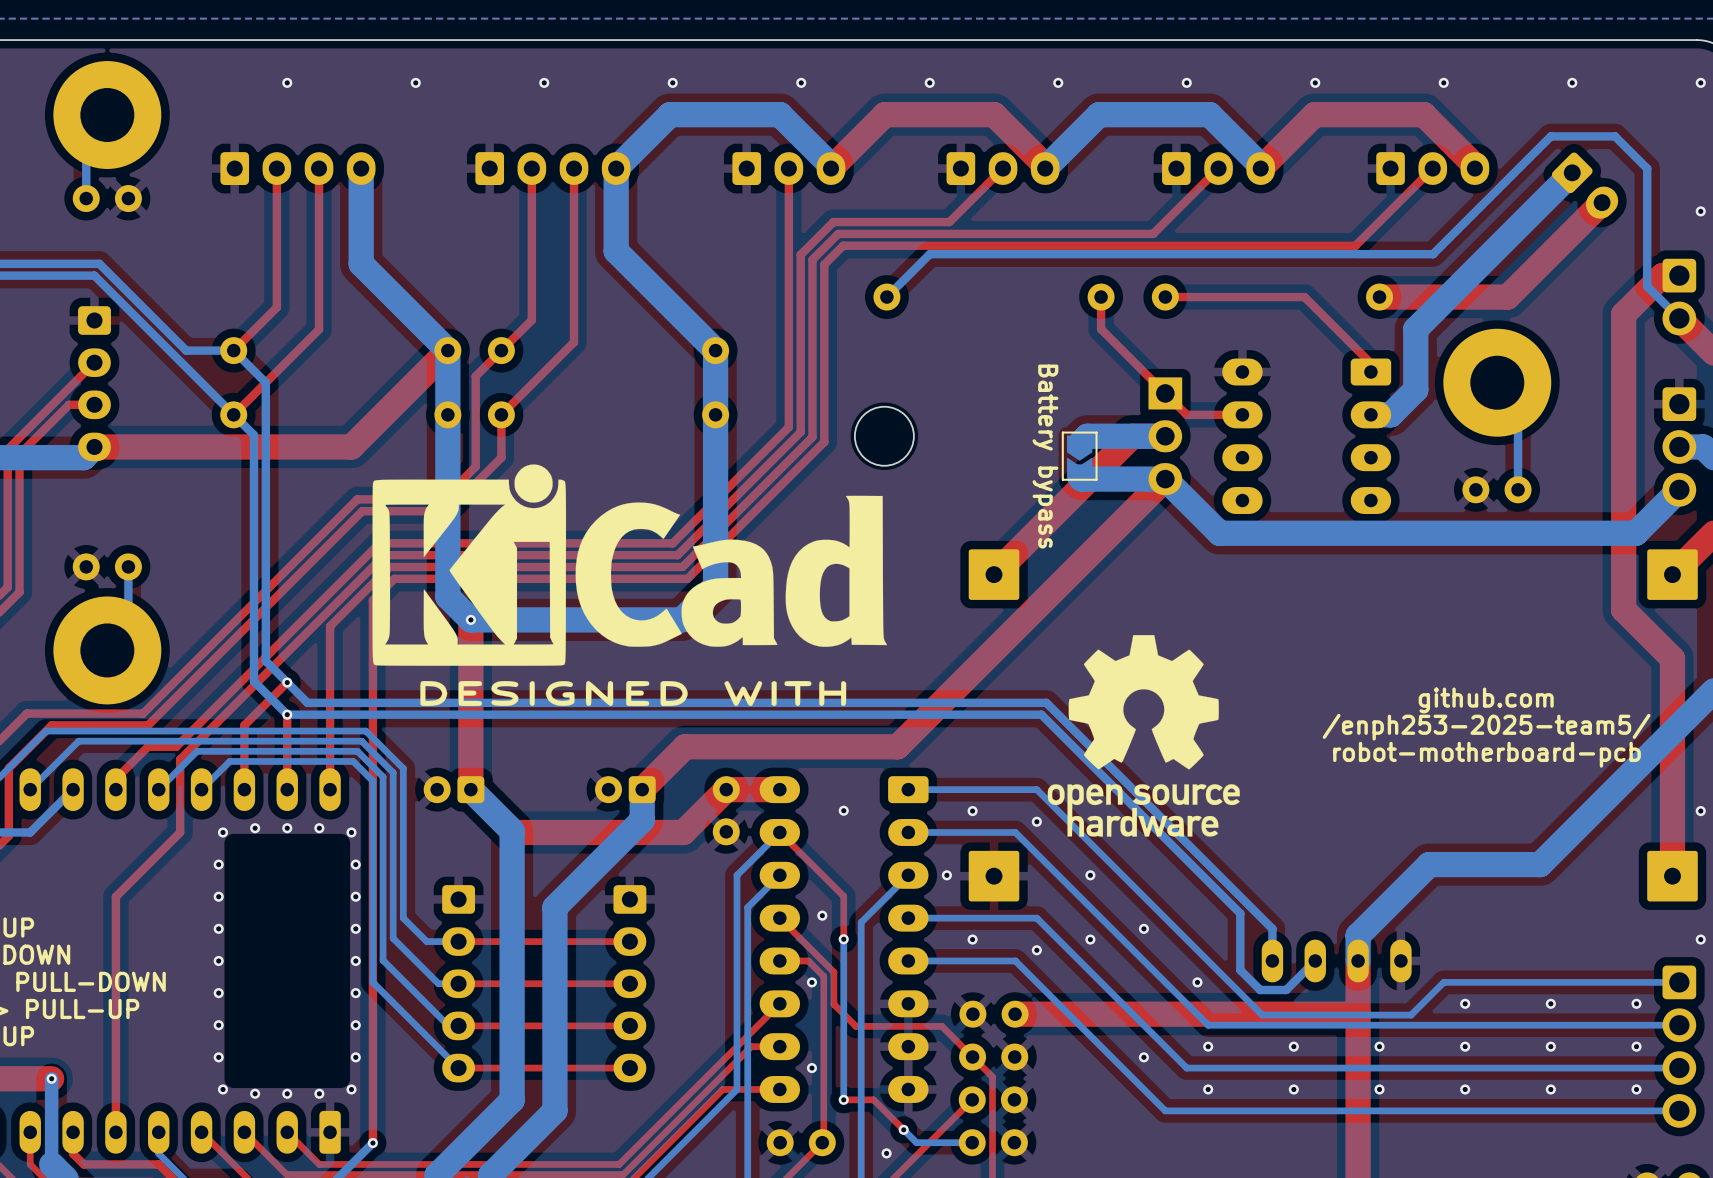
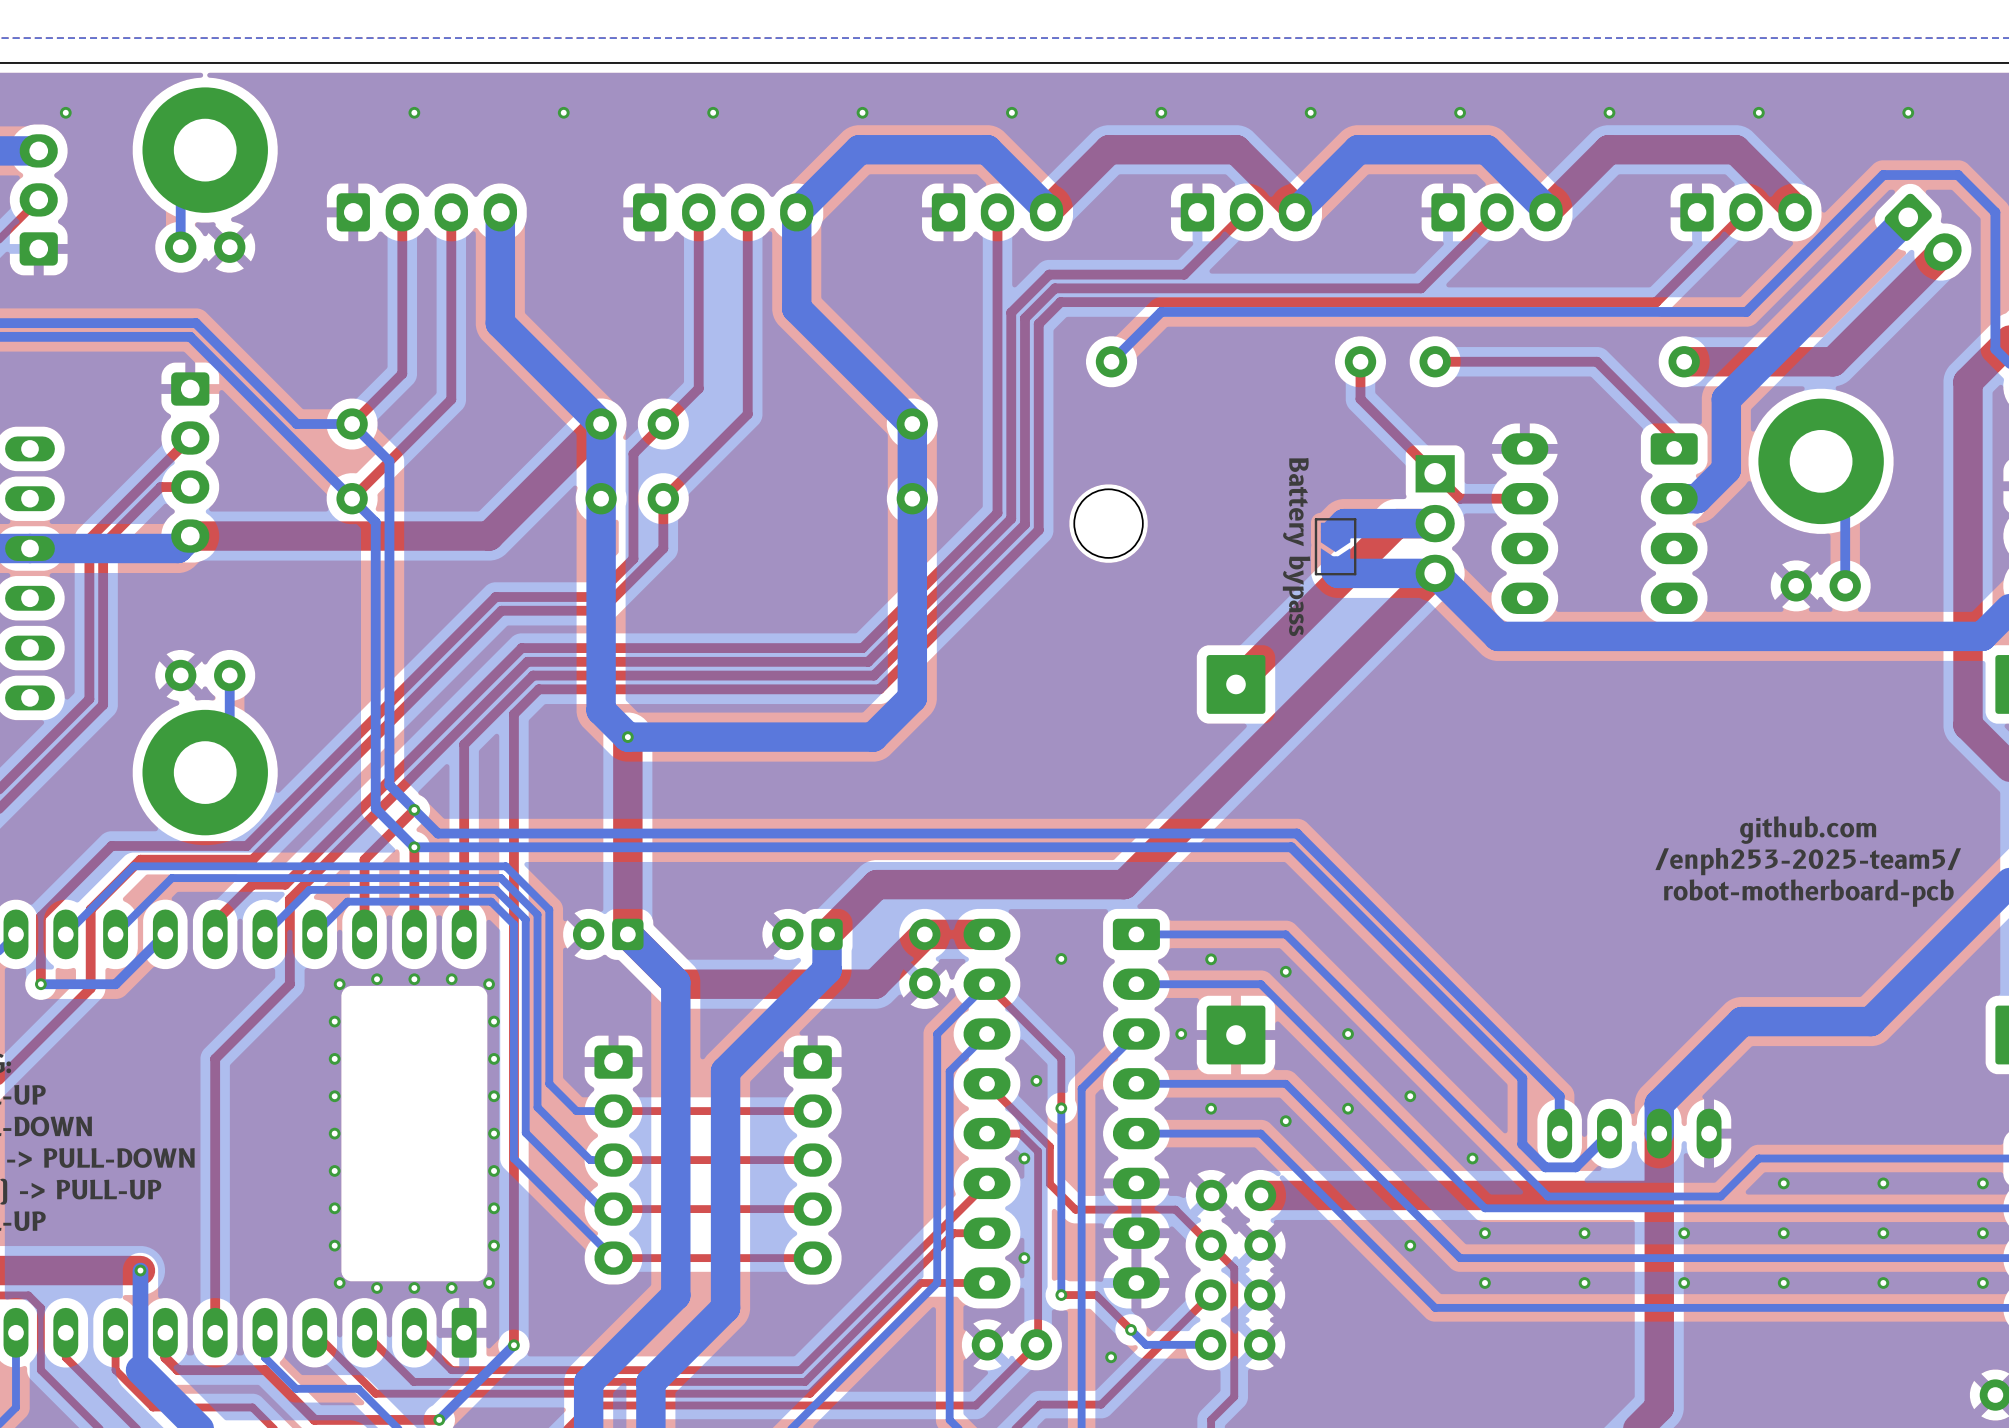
drawing: [372, 464, 888, 707] -> none
drawing: [1047, 635, 1240, 837] -> none

